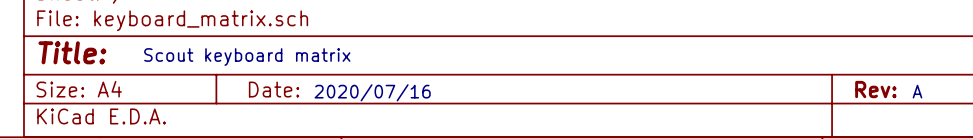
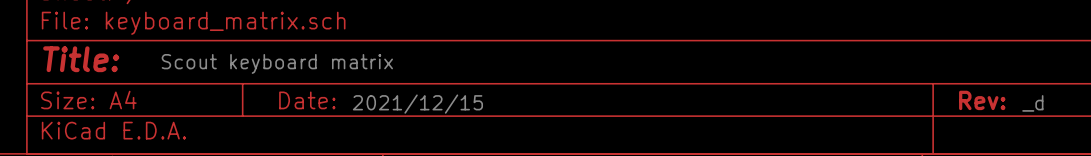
text: A (917, 91) -> _d (1032, 103)
text: 2020/07/16 (372, 92) -> 2021/12/15 (417, 104)

